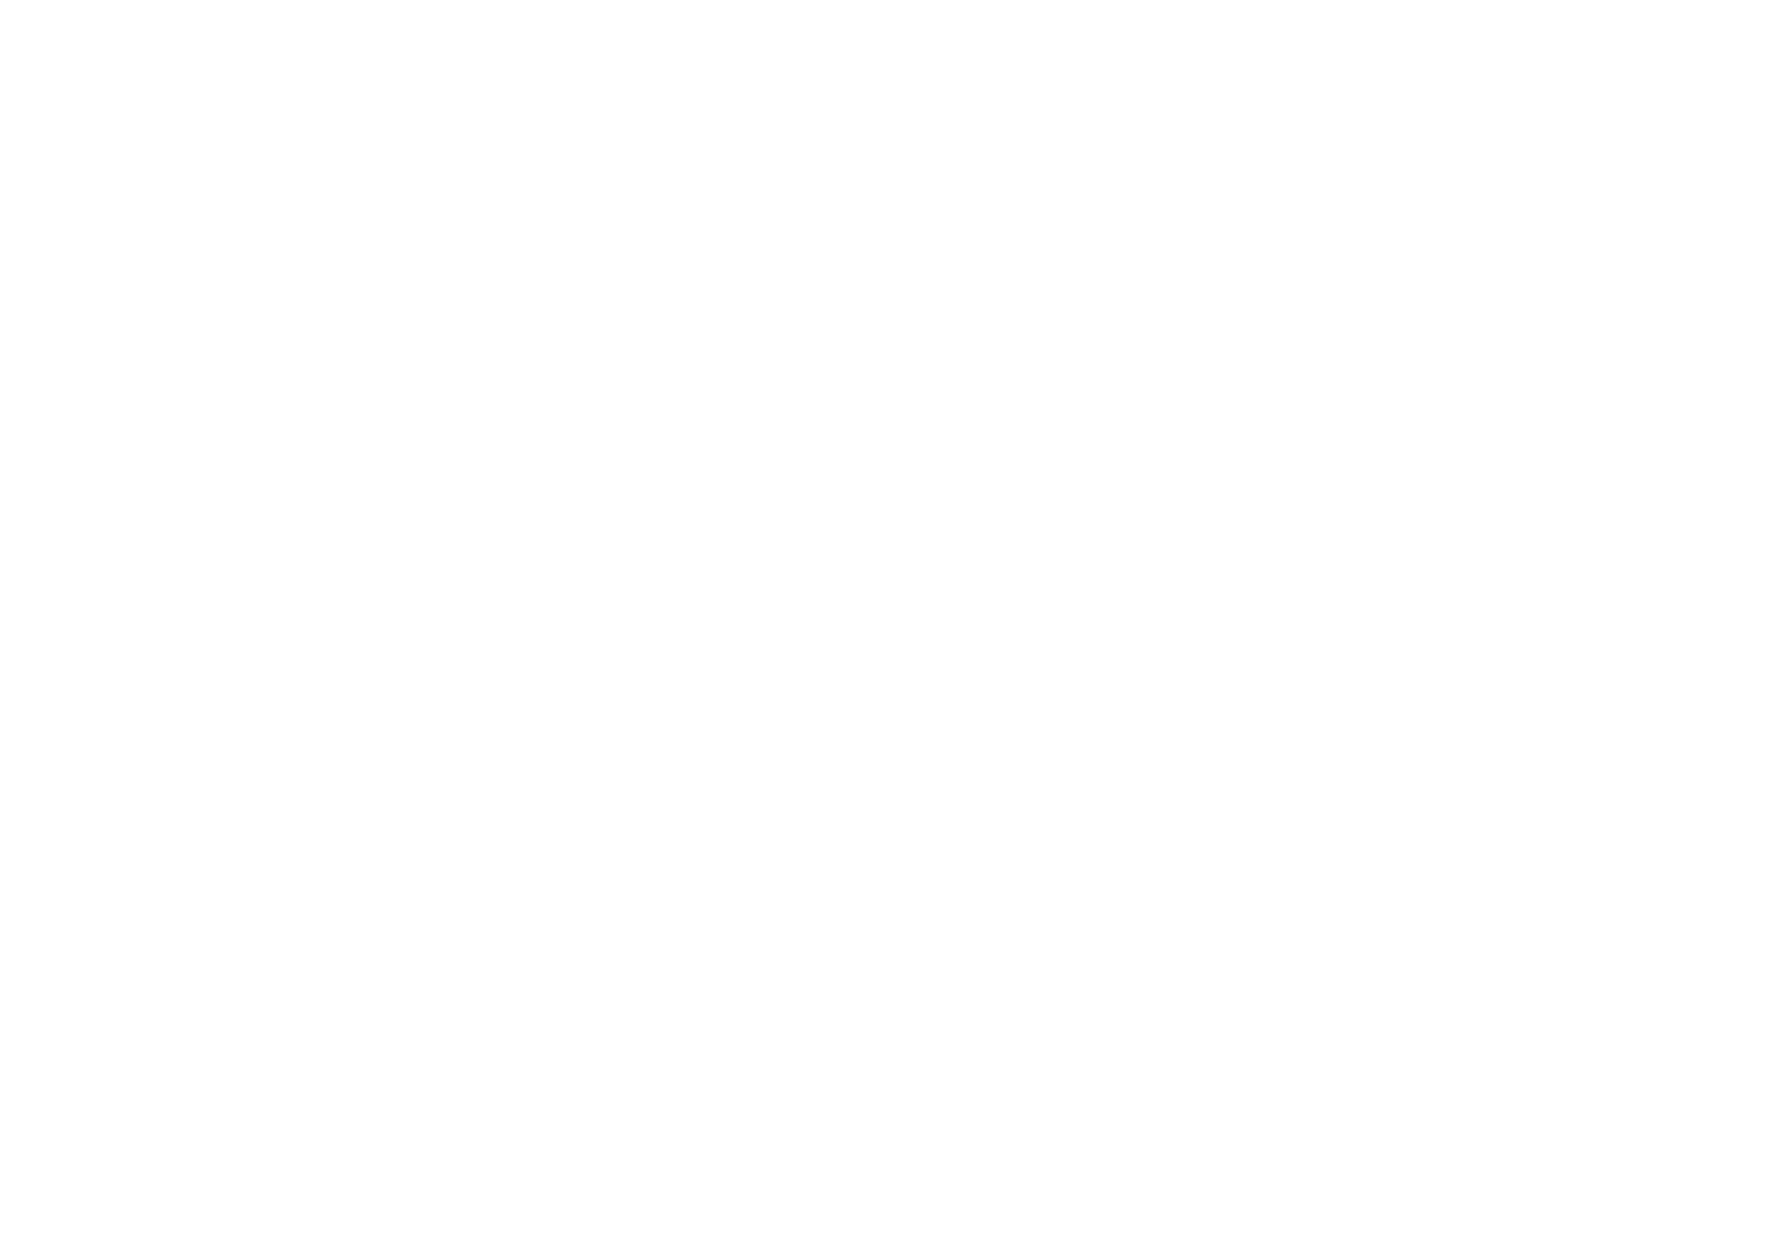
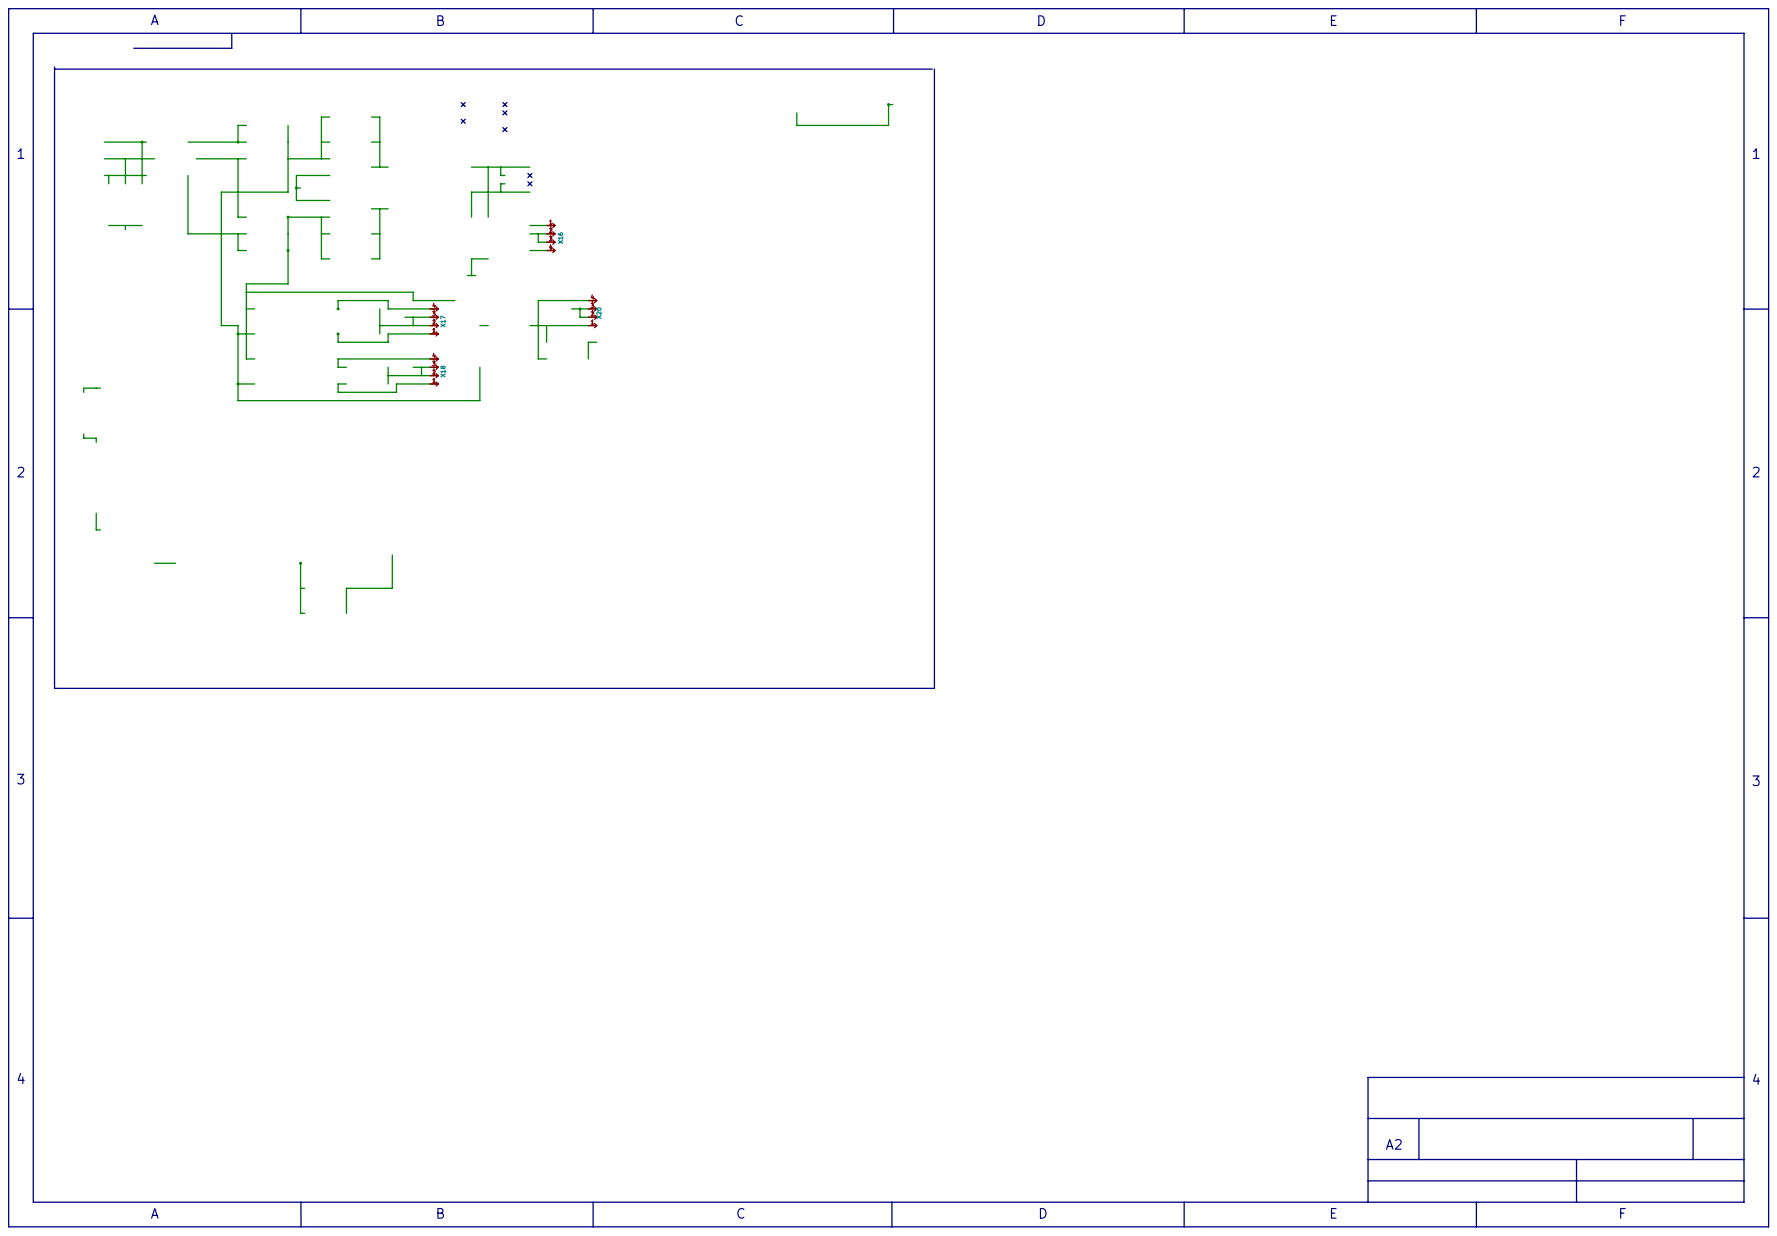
line: none -> (8, 8) (1768, 8) (1768, 1226) (8, 1226) (8, 8)
line: none -> (300, 8) (300, 33)
line: none -> (593, 8) (593, 33)
line: none -> (893, 8) (893, 33)
line: none -> (1184, 8) (1184, 33)
line: none -> (1476, 8) (1476, 33)
text: none -> A (154, 19)
text: none -> B (440, 20)
text: none -> C (739, 20)
text: none -> D (1041, 20)
text: none -> E (1333, 20)
text: none -> F (1622, 20)
line: none -> (33, 33) (33, 1202) (1743, 1202) (1743, 33) (33, 33)
line: none -> (231, 33) (231, 48) (133, 48)
line: none -> (54, 67) (54, 688) (934, 688) (934, 69)
line: none -> (54, 69) (932, 69)
no-connect mark: none -> (463, 104)
no-connect mark: none -> (504, 104)
junction: none -> (888, 104)
wire: none -> (892, 104) (888, 104) (888, 125) (796, 125) (796, 112)
no-connect mark: none -> (504, 112)
wire: none -> (329, 117) (321, 117) (321, 158)
wire: none -> (371, 117) (379, 117) (379, 167)
no-connect mark: none -> (463, 121)
wire: none -> (246, 125) (238, 125) (238, 142)
wire: none -> (288, 125) (288, 192) (221, 192) (221, 325) (238, 325) (238, 400) (479, 400) (479, 367)
no-connect mark: none -> (504, 129)
wire: none -> (104, 142) (146, 142)
wire: none -> (142, 142) (142, 183)
wire: none -> (187, 142) (246, 142)
wire: none -> (321, 142) (329, 142)
wire: none -> (371, 142) (379, 142)
text: none -> 1 (20, 153)
text: none -> 1 (1756, 153)
wire: none -> (104, 158) (154, 158)
wire: none -> (125, 158) (125, 183)
wire: none -> (196, 158) (246, 158)
wire: none -> (238, 158) (238, 217) (246, 217)
wire: none -> (288, 158) (329, 158)
wire: none -> (371, 167) (388, 167)
wire: none -> (471, 167) (529, 167)
wire: none -> (488, 167) (488, 217)
wire: none -> (500, 167) (500, 175) (504, 175)
wire: none -> (104, 175) (146, 175)
wire: none -> (108, 175) (108, 183)
wire: none -> (187, 175) (187, 233) (246, 233)
wire: none -> (329, 175) (296, 175) (296, 200) (329, 200)
no-connect mark: none -> (529, 175)
wire: none -> (504, 183) (500, 183) (500, 192)
no-connect mark: none -> (529, 183)
wire: none -> (296, 187) (300, 187)
junction: none -> (296, 187)
wire: none -> (529, 192) (471, 192) (471, 217)
wire: none -> (371, 208) (388, 208)
wire: none -> (379, 208) (379, 258) (371, 258)
junction: none -> (288, 217)
wire: none -> (321, 217) (321, 258) (329, 258)
wire: none -> (329, 217) (288, 217) (288, 283) (246, 283) (246, 358) (254, 358)
wire: none -> (108, 225) (142, 225)
wire: none -> (125, 225) (125, 229)
wire: none -> (529, 225) (546, 225)
wire: none -> (238, 233) (238, 250) (246, 250)
wire: none -> (321, 233) (329, 233)
wire: none -> (371, 233) (379, 233)
wire: none -> (529, 233) (546, 233)
wire: none -> (538, 233) (538, 242) (546, 242)
part: none -> (550, 238)
junction: none -> (288, 250)
wire: none -> (529, 250) (546, 250)
wire: none -> (488, 258) (471, 258) (471, 275)
wire: none -> (467, 275) (475, 275)
wire: none -> (246, 292) (413, 292) (413, 300) (454, 300)
wire: none -> (588, 300) (538, 300) (538, 358) (546, 358)
wire: none -> (246, 308) (254, 308)
wire: none -> (338, 308) (338, 300) (388, 300) (388, 308) (429, 308)
junction: none -> (338, 308)
wire: none -> (379, 308) (379, 333)
wire: none -> (571, 308) (588, 308)
wire: none -> (579, 308) (579, 317) (588, 317)
line: none -> (8, 309) (33, 309)
line: none -> (1743, 309) (1768, 309)
part: none -> (592, 313)
wire: none -> (404, 317) (429, 317)
wire: none -> (413, 317) (413, 325)
part: none -> (434, 321)
wire: none -> (379, 325) (429, 325)
wire: none -> (479, 325) (488, 325)
wire: none -> (529, 325) (588, 325)
wire: none -> (546, 325) (546, 342)
wire: none -> (238, 333) (254, 333)
wire: none -> (338, 333) (338, 342) (388, 342) (388, 333) (429, 333)
junction: none -> (338, 333)
wire: none -> (596, 342) (588, 342) (588, 358)
wire: none -> (429, 358) (338, 358) (338, 367) (346, 367)
wire: none -> (388, 367) (388, 383)
wire: none -> (413, 367) (429, 367)
wire: none -> (421, 367) (421, 375)
part: none -> (434, 371)
wire: none -> (388, 375) (429, 375)
wire: none -> (238, 383) (254, 383)
wire: none -> (346, 383) (338, 383) (338, 392) (396, 392) (396, 383) (429, 383)
wire: none -> (100, 388) (83, 388) (83, 392)
wire: none -> (83, 434) (83, 438) (96, 438) (96, 442)
text: none -> 2 (20, 472)
text: none -> 2 (1756, 472)
wire: none -> (96, 513) (96, 529) (100, 529)
wire: none -> (392, 554) (392, 588) (346, 588) (346, 613)
wire: none -> (154, 563) (175, 563)
wire: none -> (300, 563) (300, 613) (304, 613)
junction: none -> (300, 563)
wire: none -> (300, 588) (304, 588)
line: none -> (8, 617) (33, 617)
line: none -> (1743, 617) (1768, 617)
text: none -> 3 (20, 779)
text: none -> 3 (1756, 780)
line: none -> (8, 918) (33, 918)
line: none -> (1743, 918) (1768, 918)
line: none -> (1743, 1077) (1368, 1077) (1368, 1202)
text: none -> 4 (21, 1078)
text: none -> 4 (1756, 1079)
line: none -> (1368, 1118) (1743, 1118)
line: none -> (1418, 1118) (1418, 1159)
line: none -> (1693, 1118) (1693, 1159)
text: none -> A2 (1393, 1144)
line: none -> (1368, 1159) (1743, 1159)
line: none -> (1576, 1159) (1576, 1202)
line: none -> (1368, 1180) (1743, 1180)
line: none -> (300, 1202) (301, 1226)
line: none -> (593, 1202) (593, 1226)
line: none -> (891, 1202) (891, 1226)
line: none -> (1184, 1202) (1184, 1226)
line: none -> (1476, 1202) (1476, 1226)
text: none -> A (154, 1213)
text: none -> B (440, 1213)
text: none -> C (740, 1213)
text: none -> D (1043, 1213)
text: none -> E (1333, 1213)
text: none -> F (1622, 1213)

